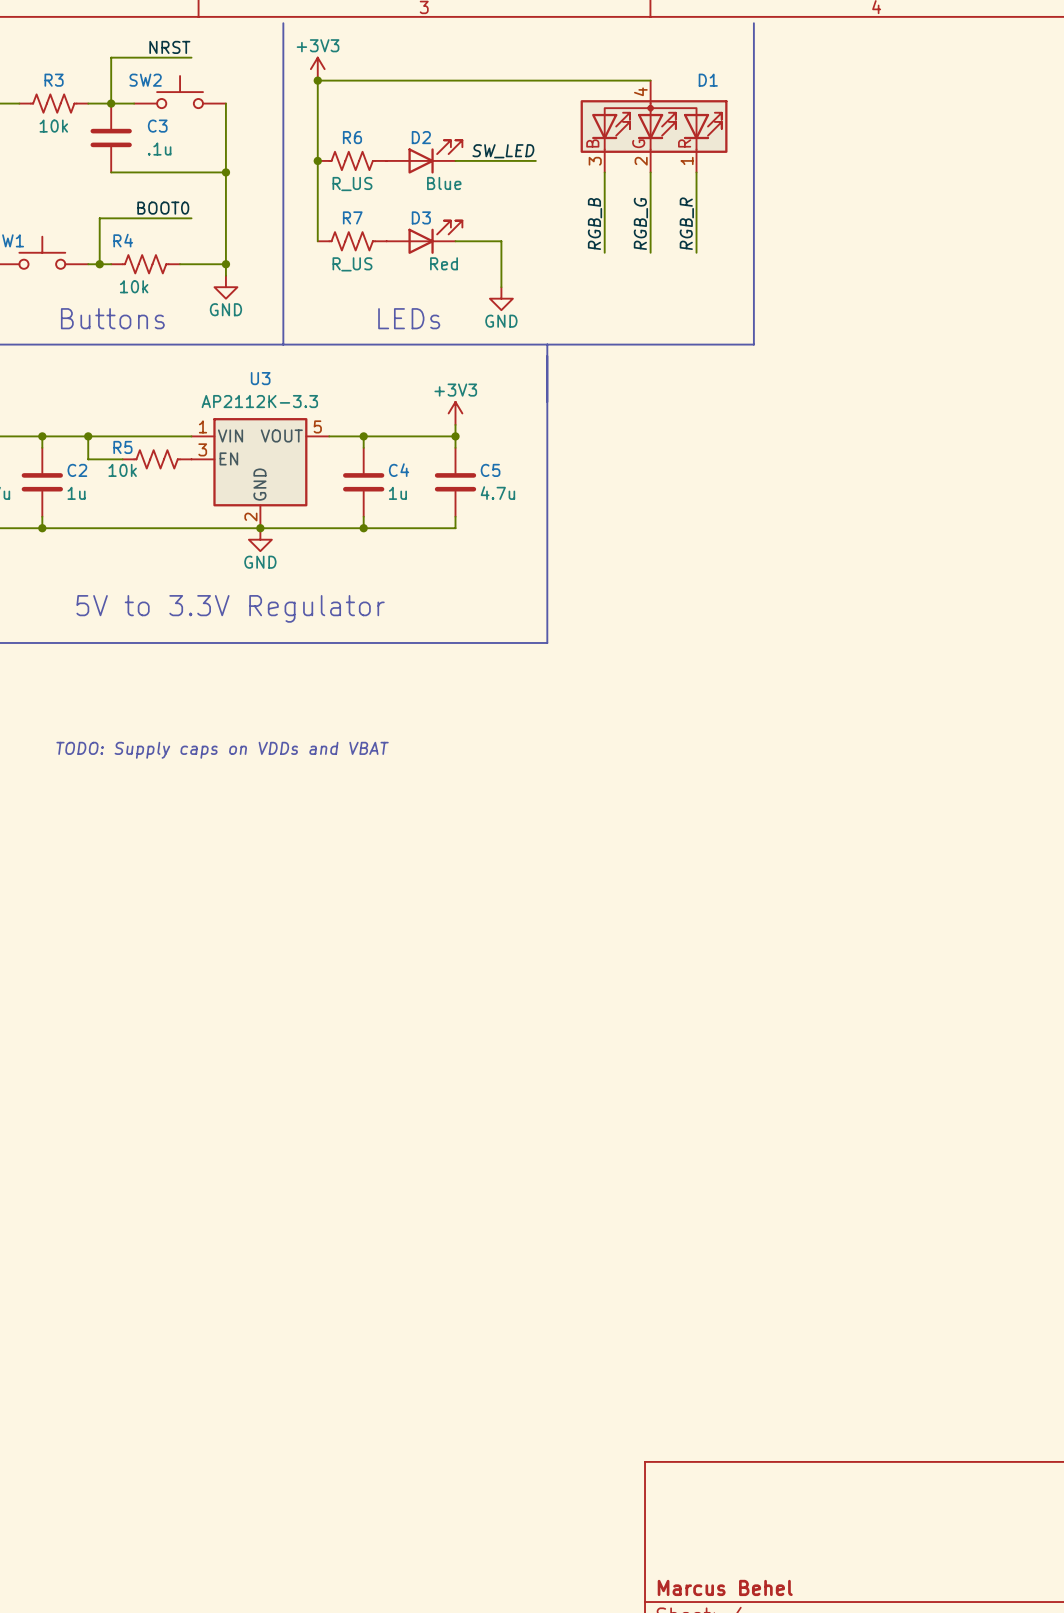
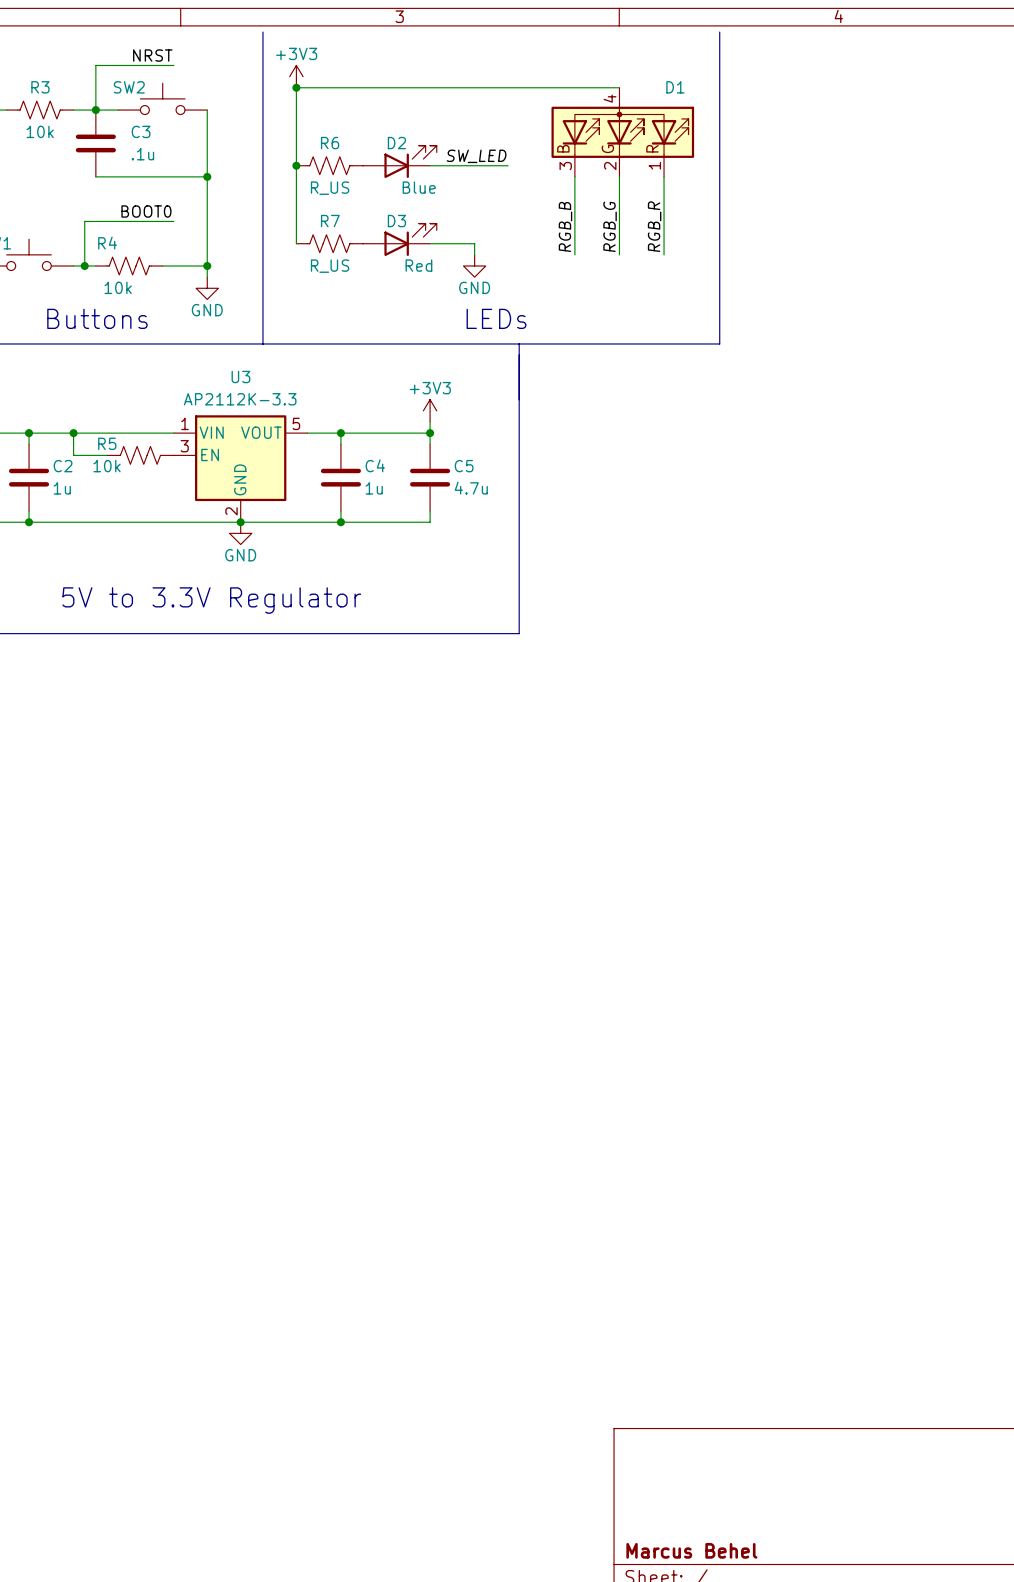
power symbol position: GND (501, 298) -> GND (474, 266)
text position: LEDs (409, 318) -> LEDs (496, 318)
text: TODO: Supply caps on VDDs and VBAT (222, 750) -> none

